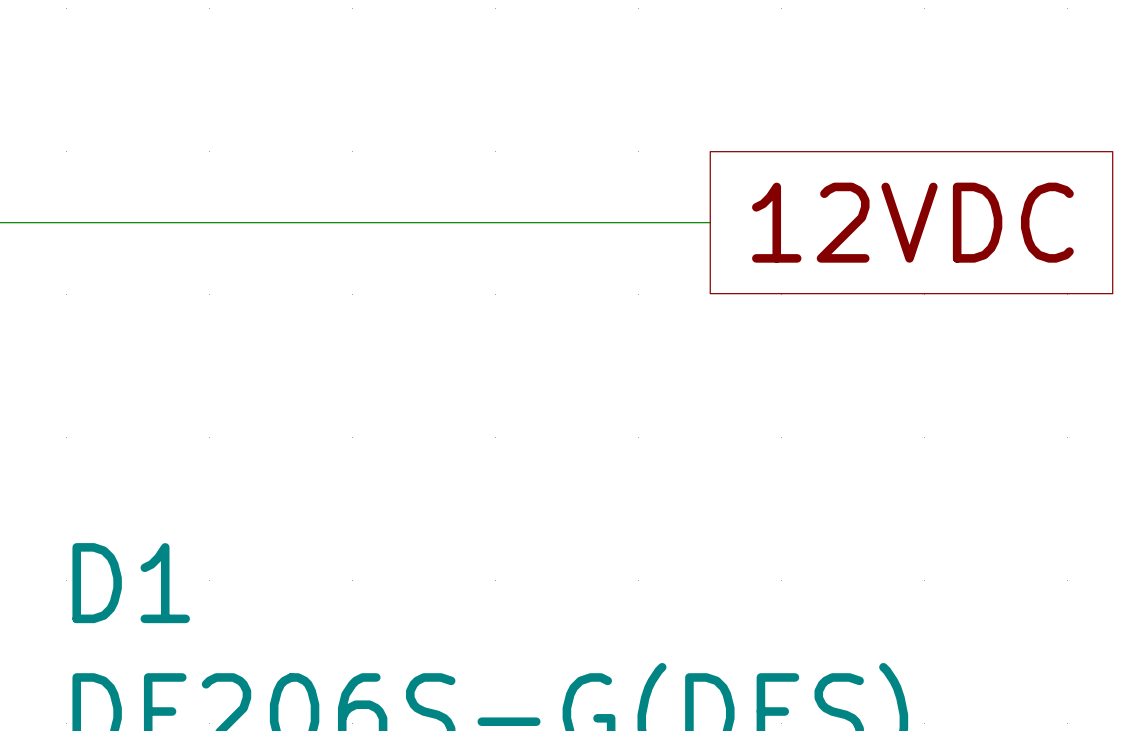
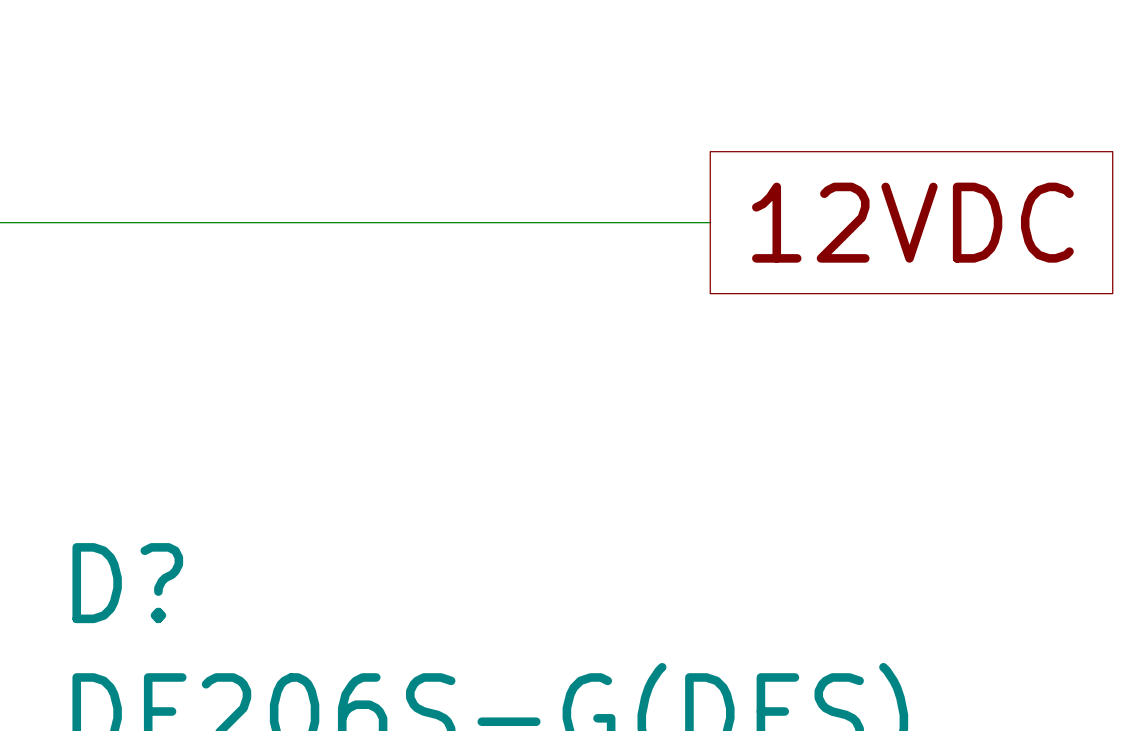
D1 name: D1 (131, 583) -> D? (127, 583)

